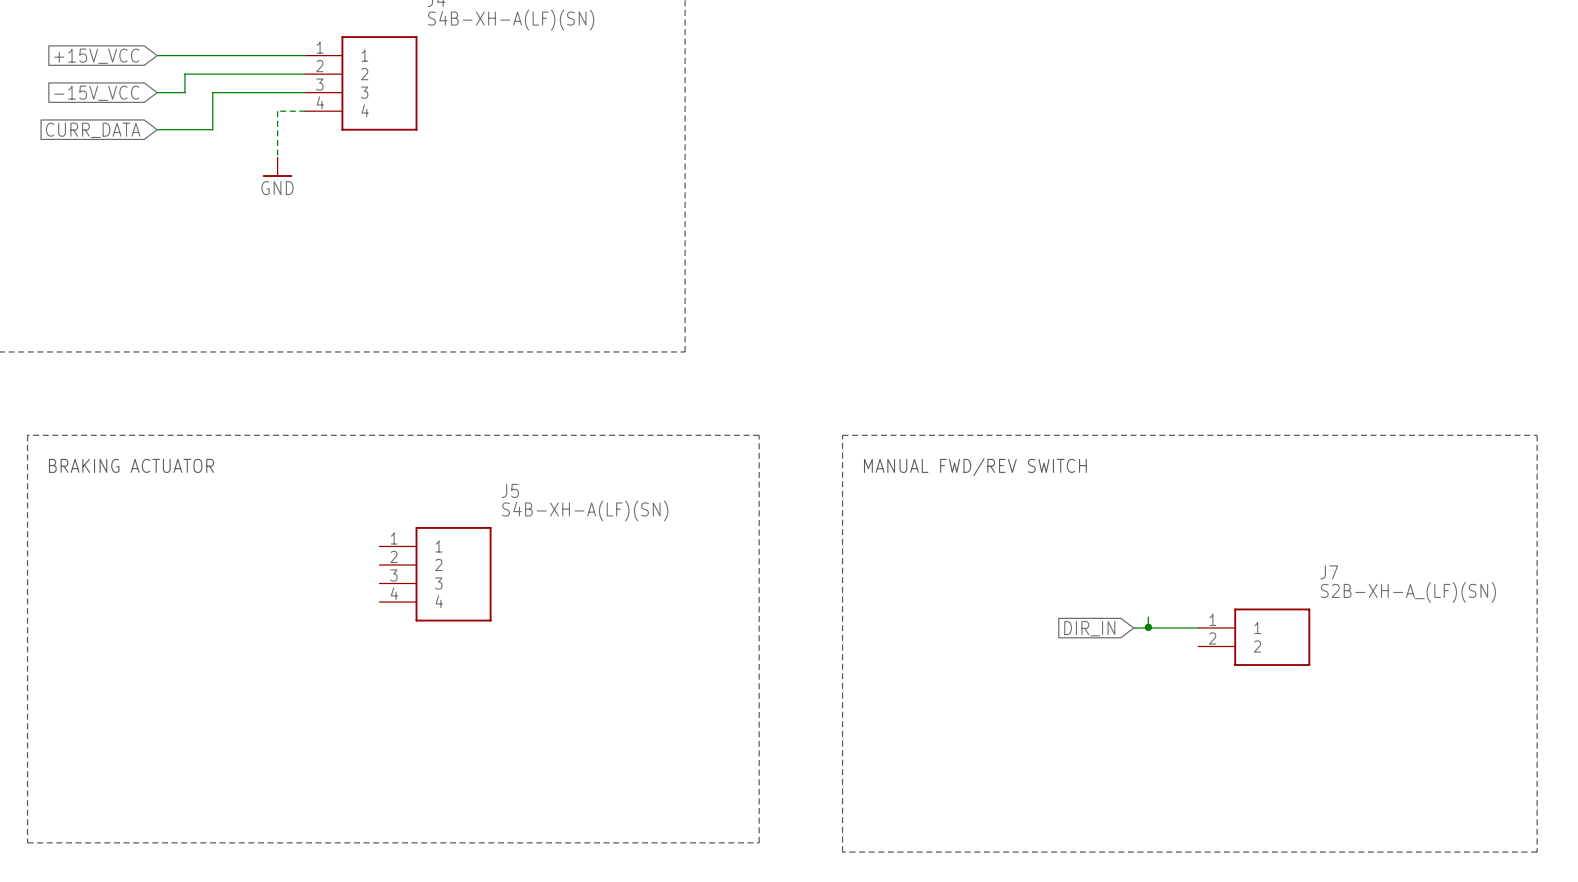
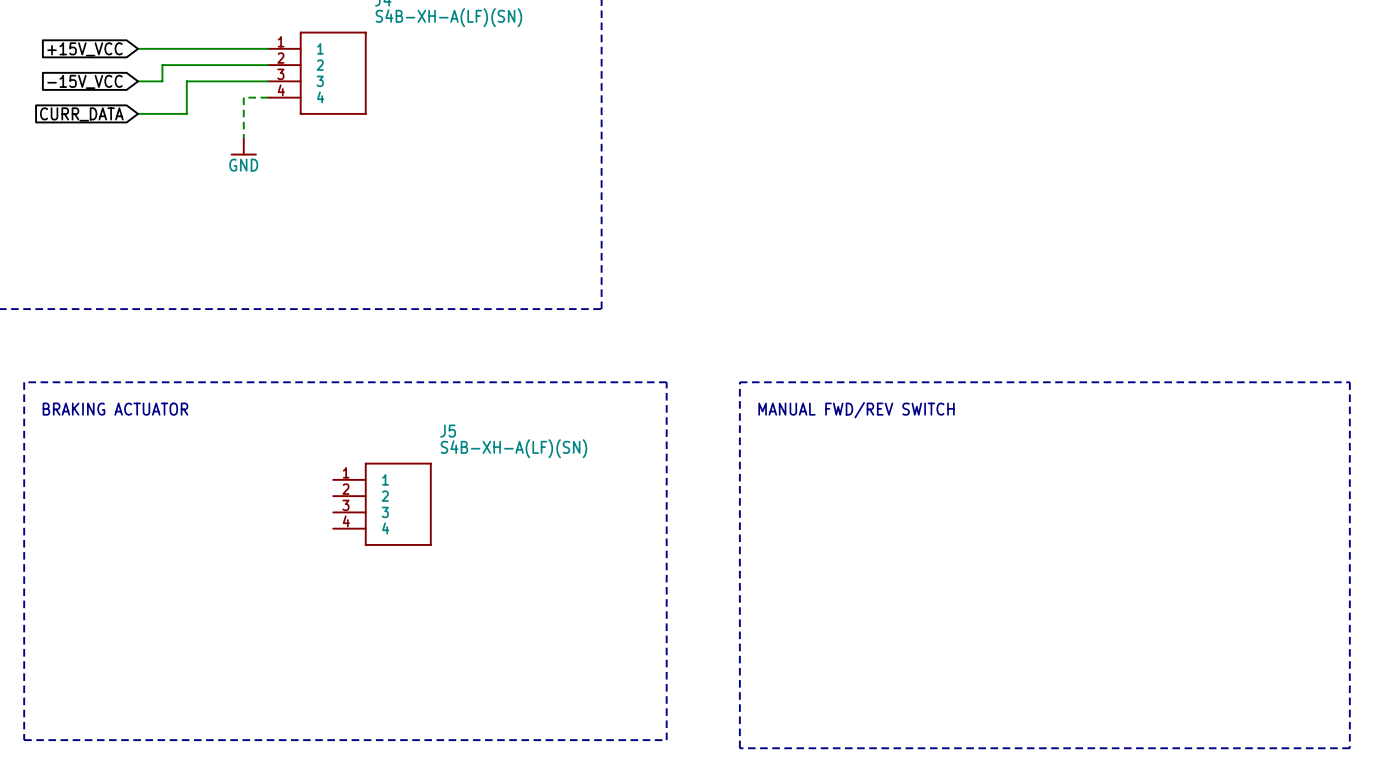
wire: (1148, 617) (1148, 627) (1198, 627) -> none
junction: (1148, 627) -> none
global label: DIR_IN (1089, 628) -> none
wire: (1133, 628) (1148, 628) -> none
J7: S2B-XH-A_(LF)(SN) (1254, 637) -> none

